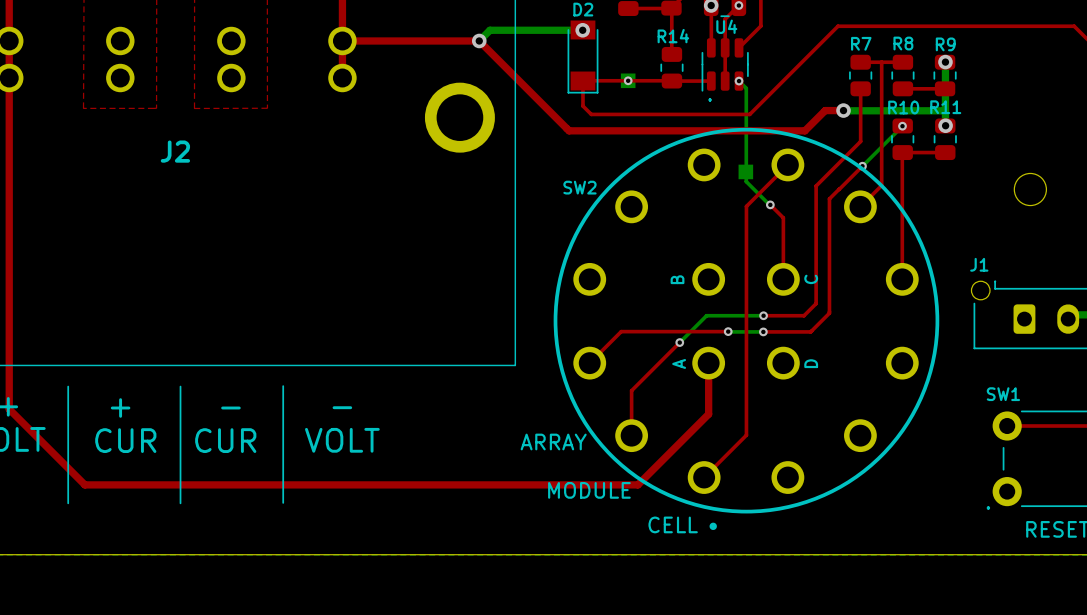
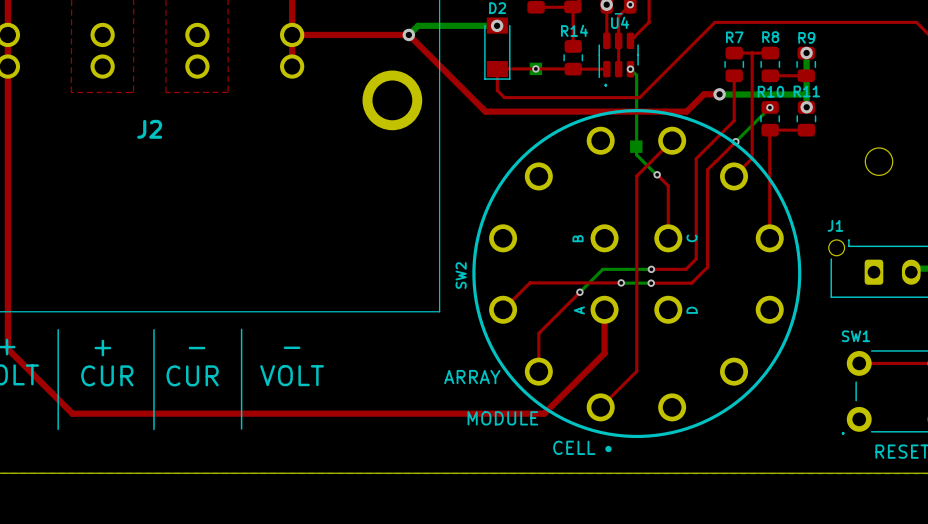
SW2 footprint: [553, 127, 940, 531] -> [472, 109, 802, 453]
SW2 name position: SW2 (579, 187) -> SW2 (461, 275)

